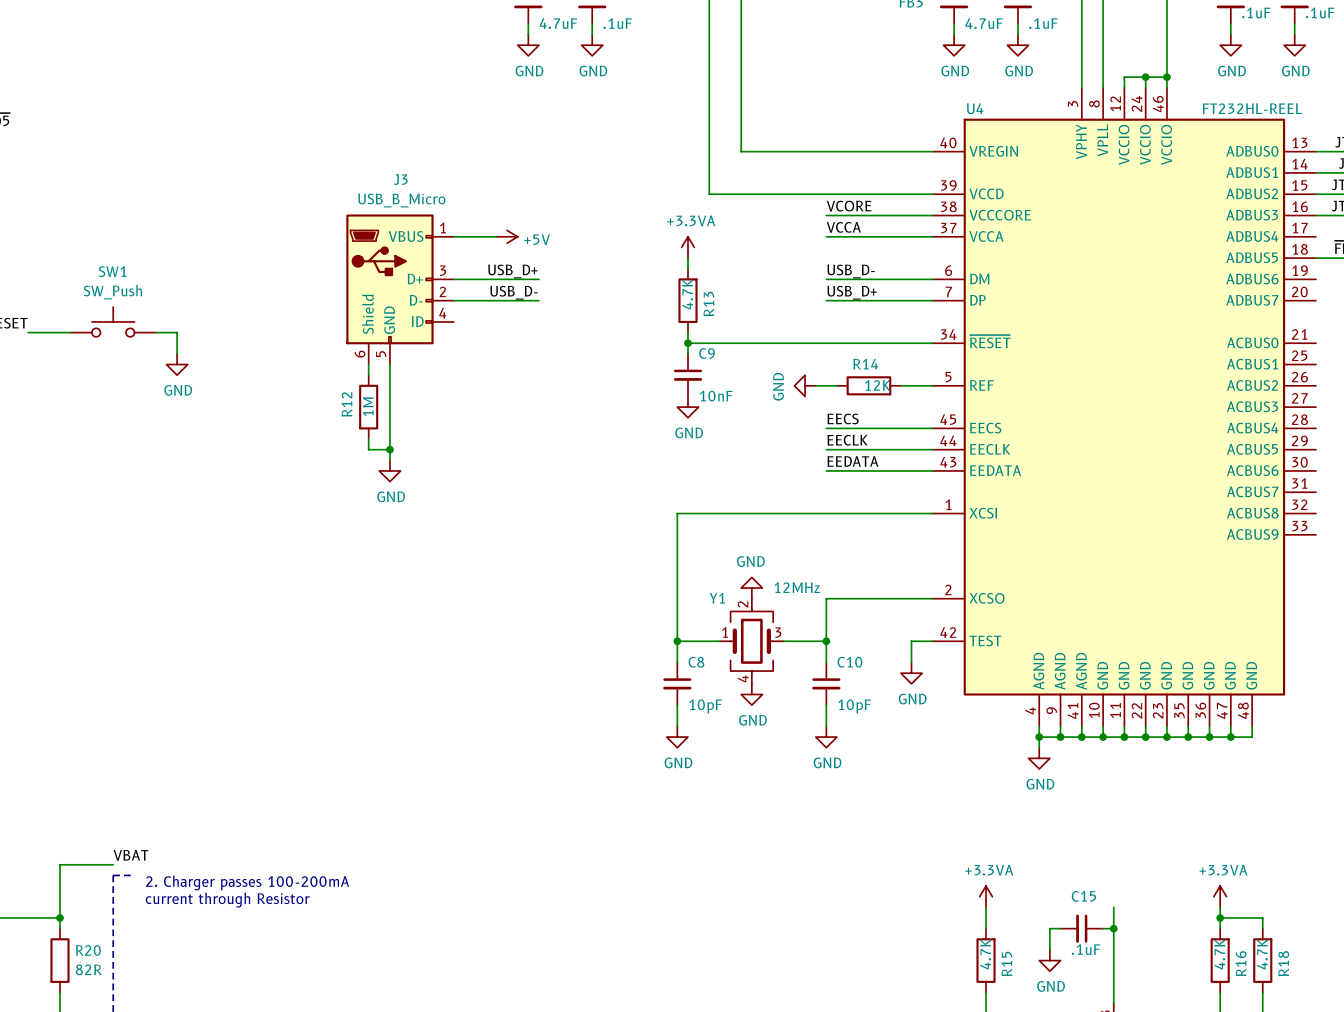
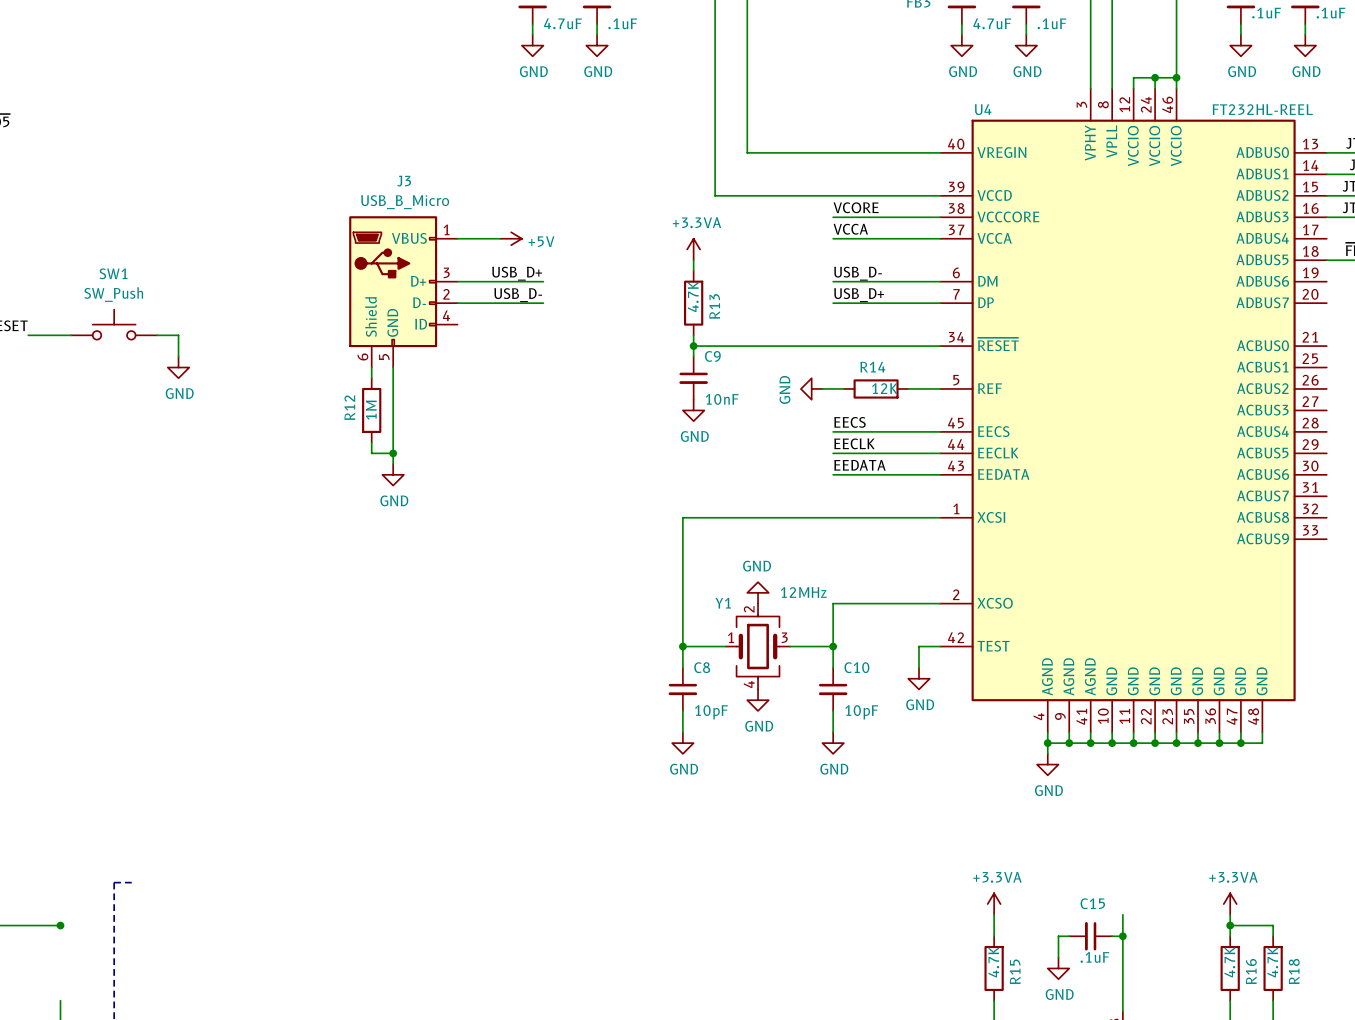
label: VBAT (131, 855) -> none
wire: (113, 864) (60, 864) (60, 928) -> none
text: 2. Charger passes 100-200mA (247, 882) -> none
text: current through Resistor (227, 900) -> none
R20: 82R (60, 960) -> none

